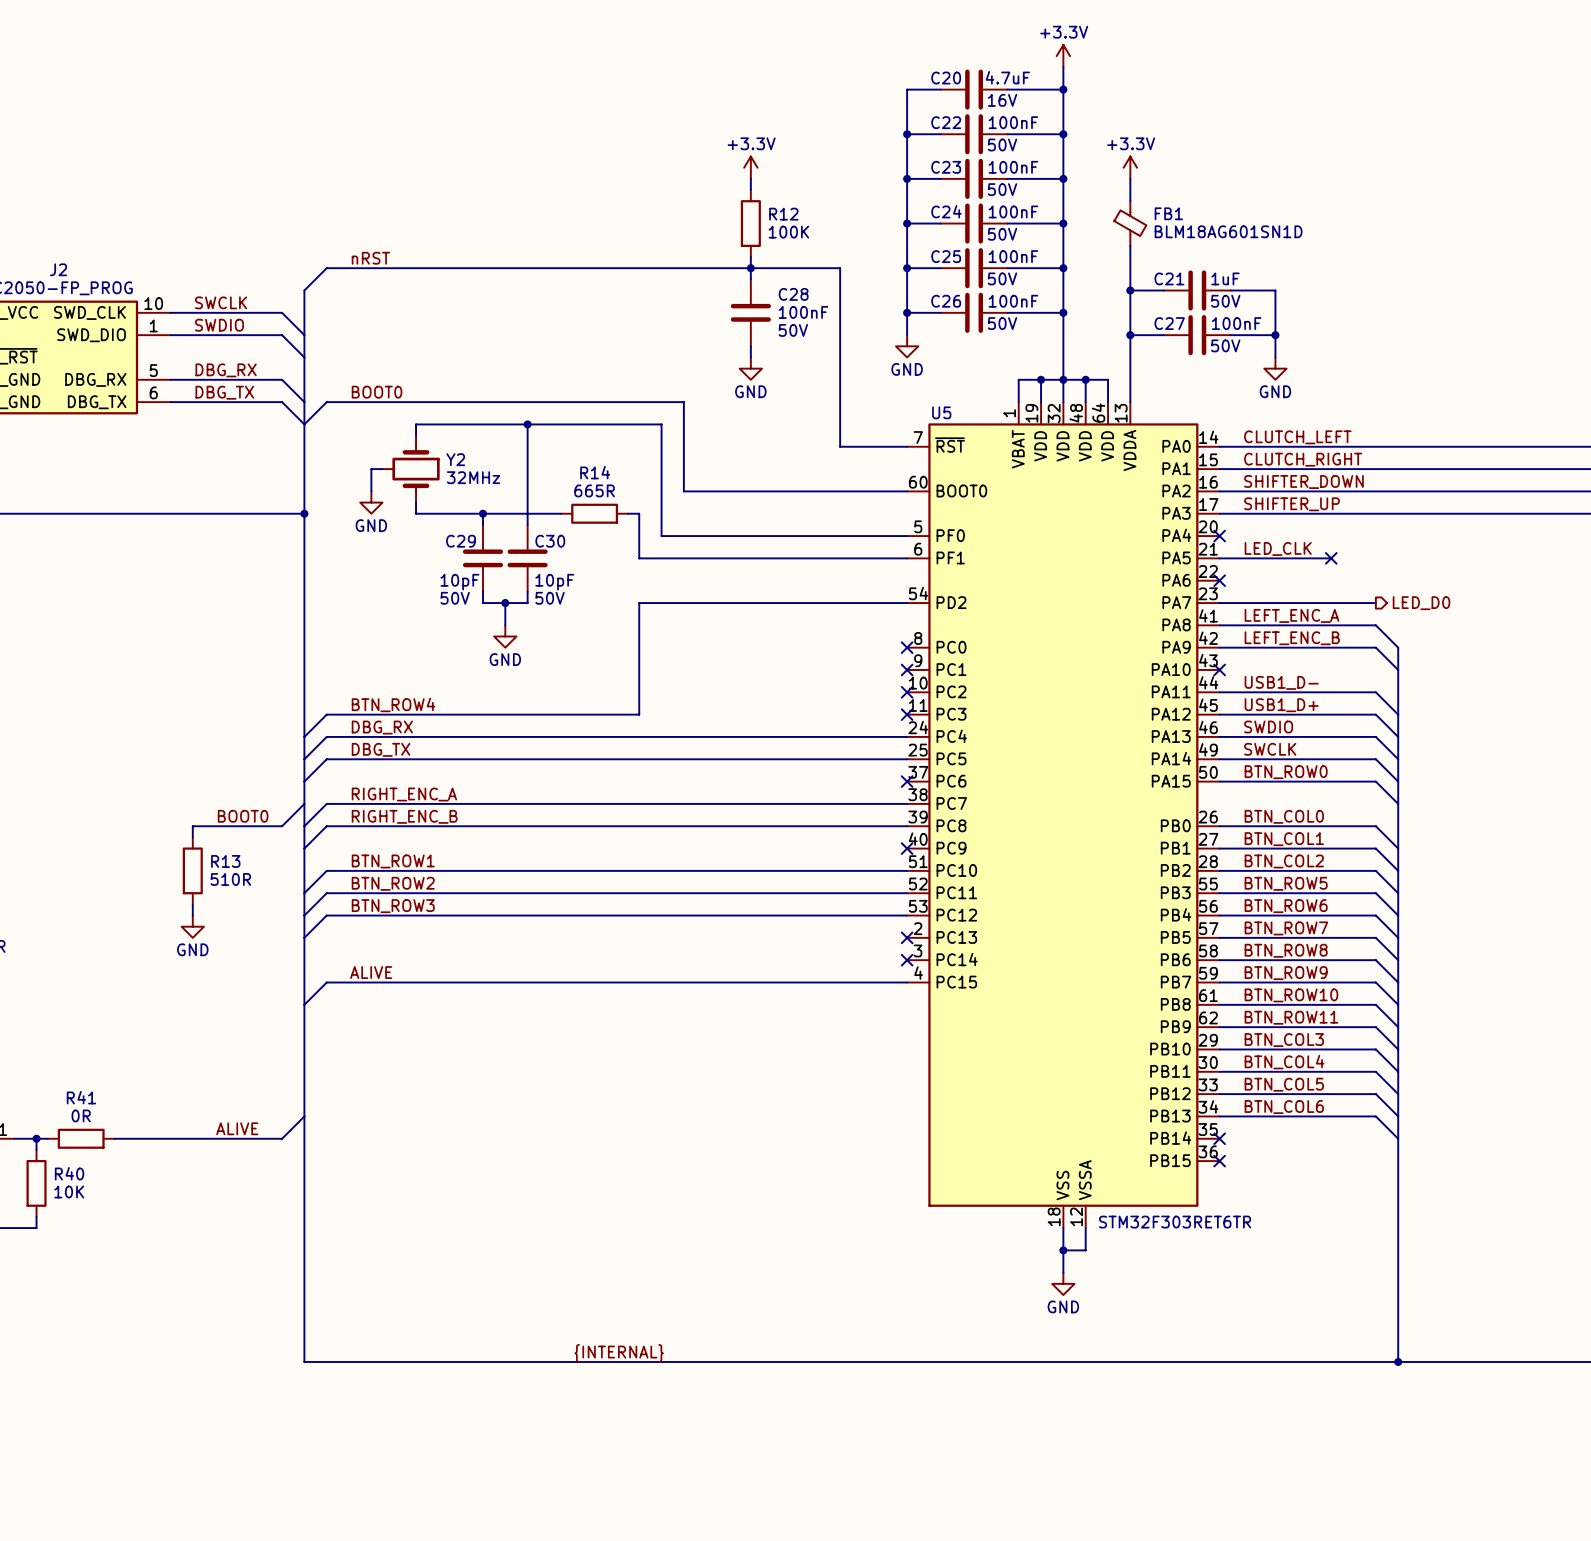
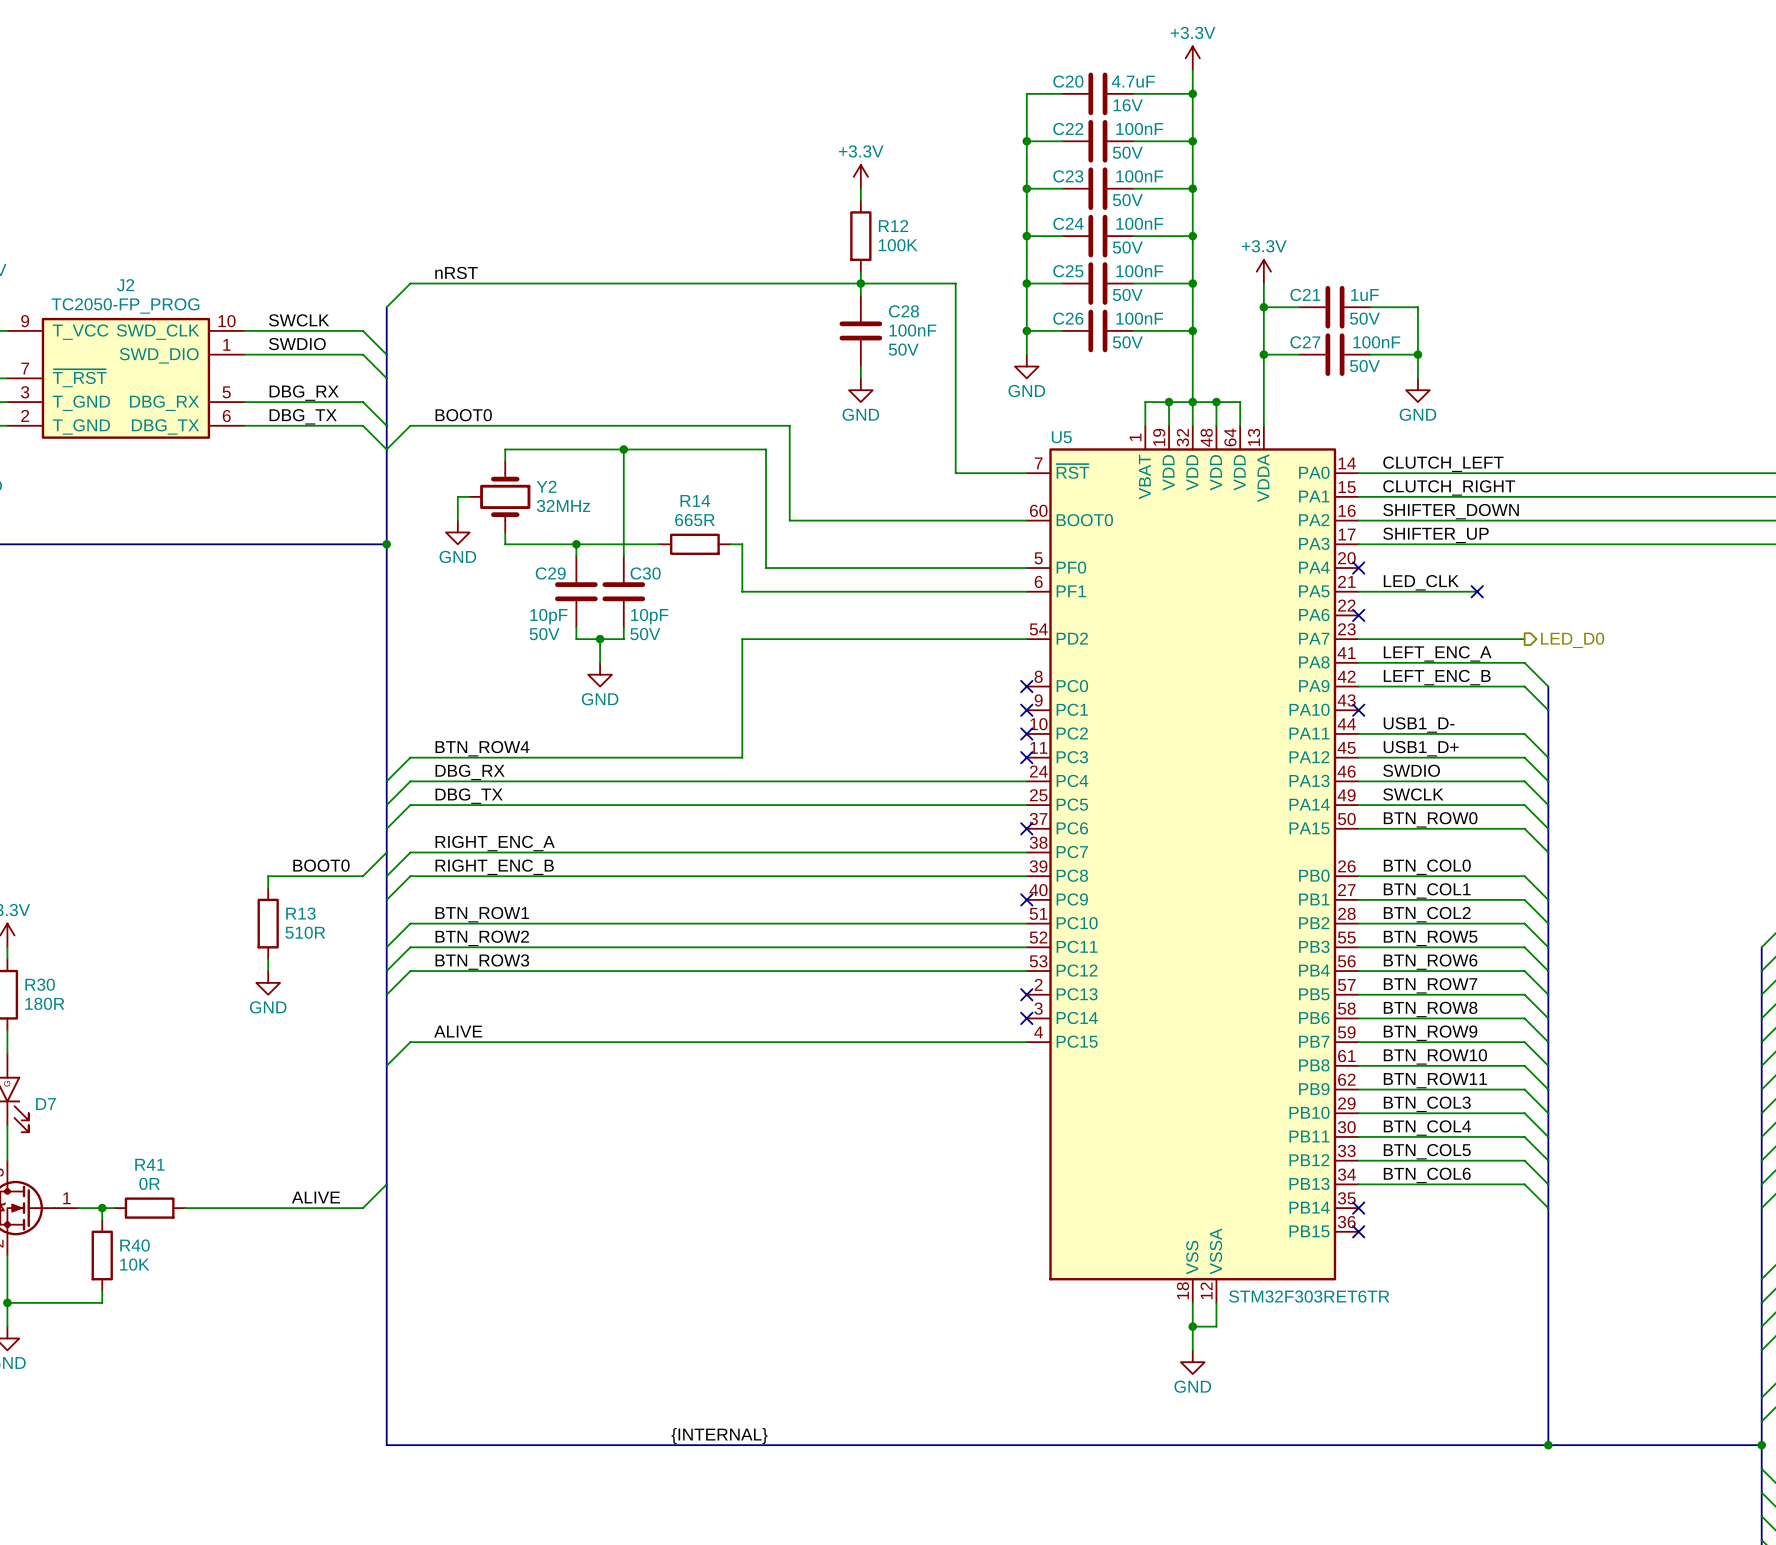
power symbol position: +3.3V (1130, 167) -> +3.3V (1263, 271)
wire: (1130, 178) (1130, 201) -> none
FB1: (1130, 223) -> none

